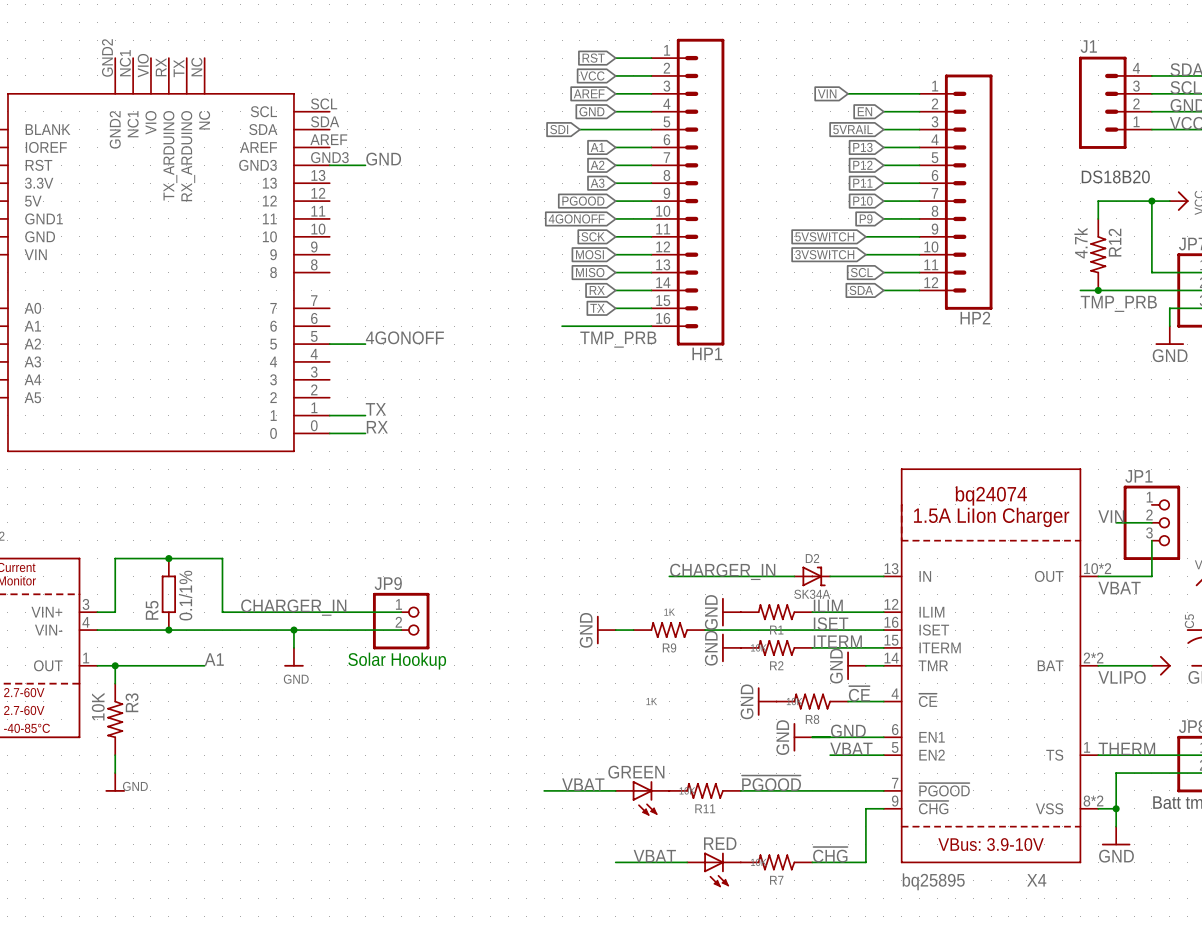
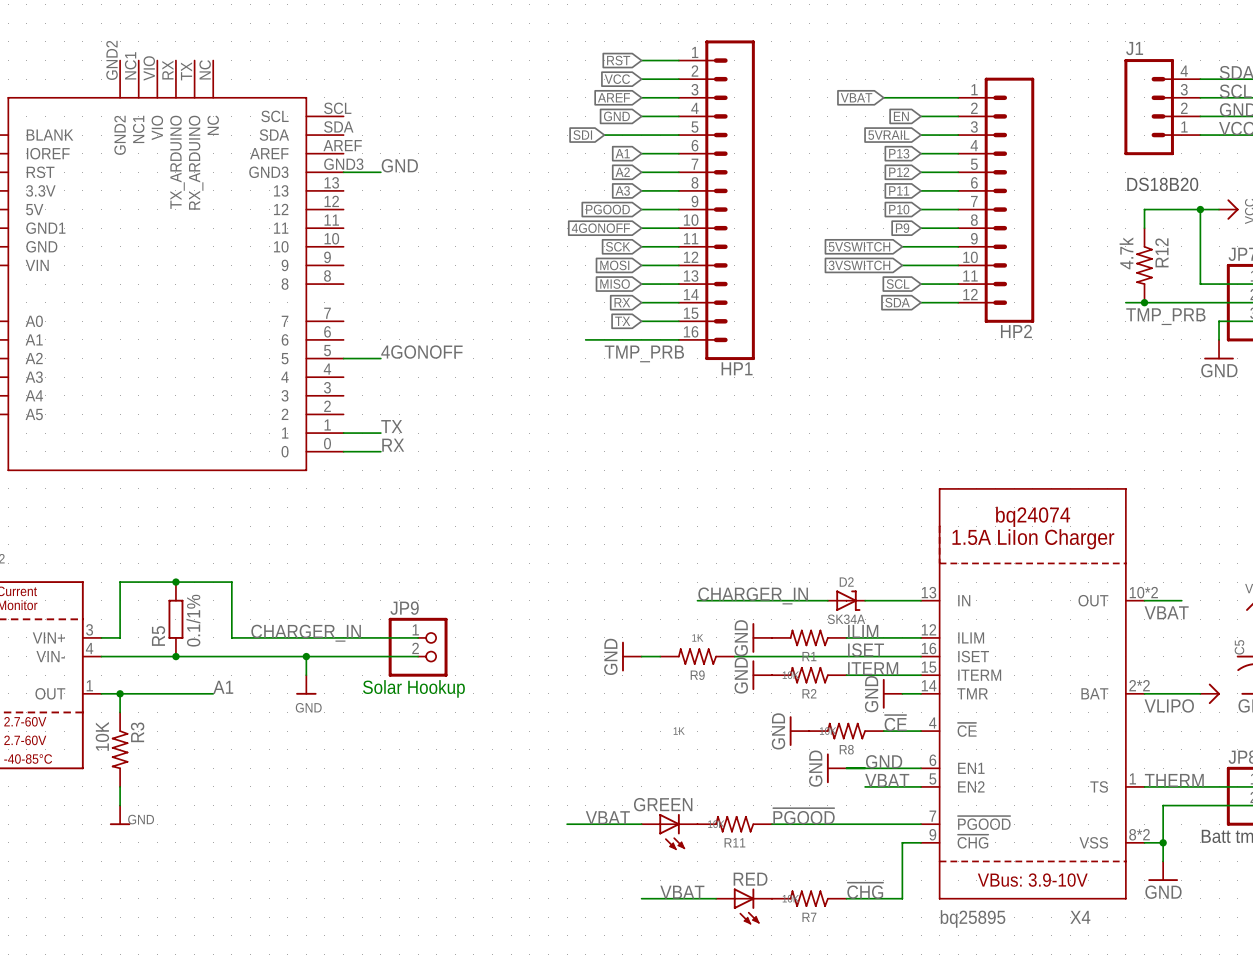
global label: VIN (827, 93) -> VBAT (856, 97)
label: VIN (1111, 516) -> none
wire: (1116, 522) (1151, 522) -> none
JP1: (1151, 522) -> none
wire: (1151, 540) (1151, 576) (1134, 576) -> none

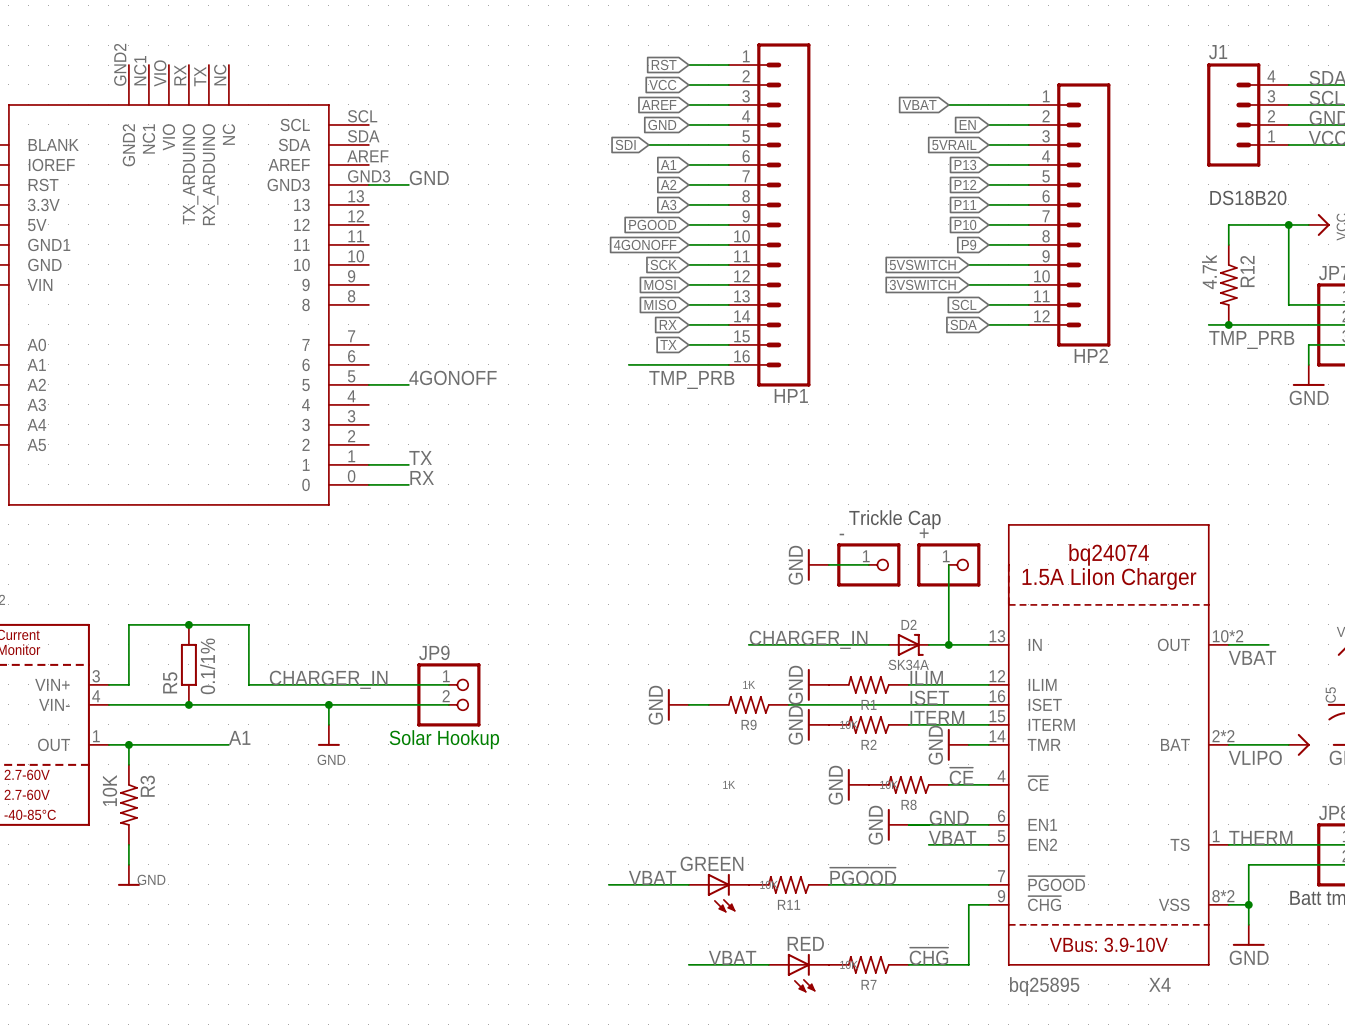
text: none -> Trickle Cap (894, 519)
power symbol: none -> GND (818, 564)
wire: none -> (828, 564) (868, 564)
part: none -> (868, 564)
wire: none -> (948, 564) (948, 644)
part: none -> (948, 564)
junction: none -> (948, 644)

